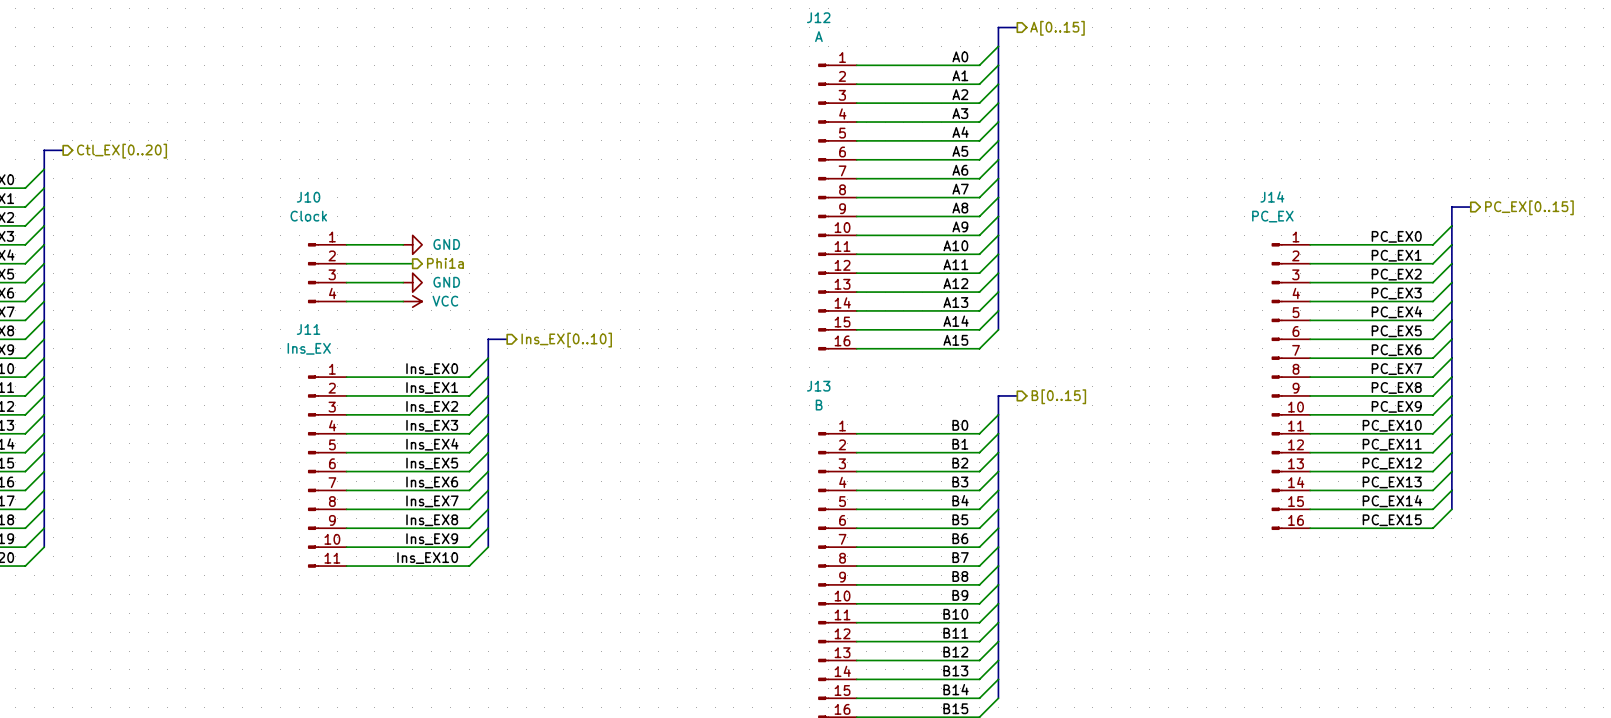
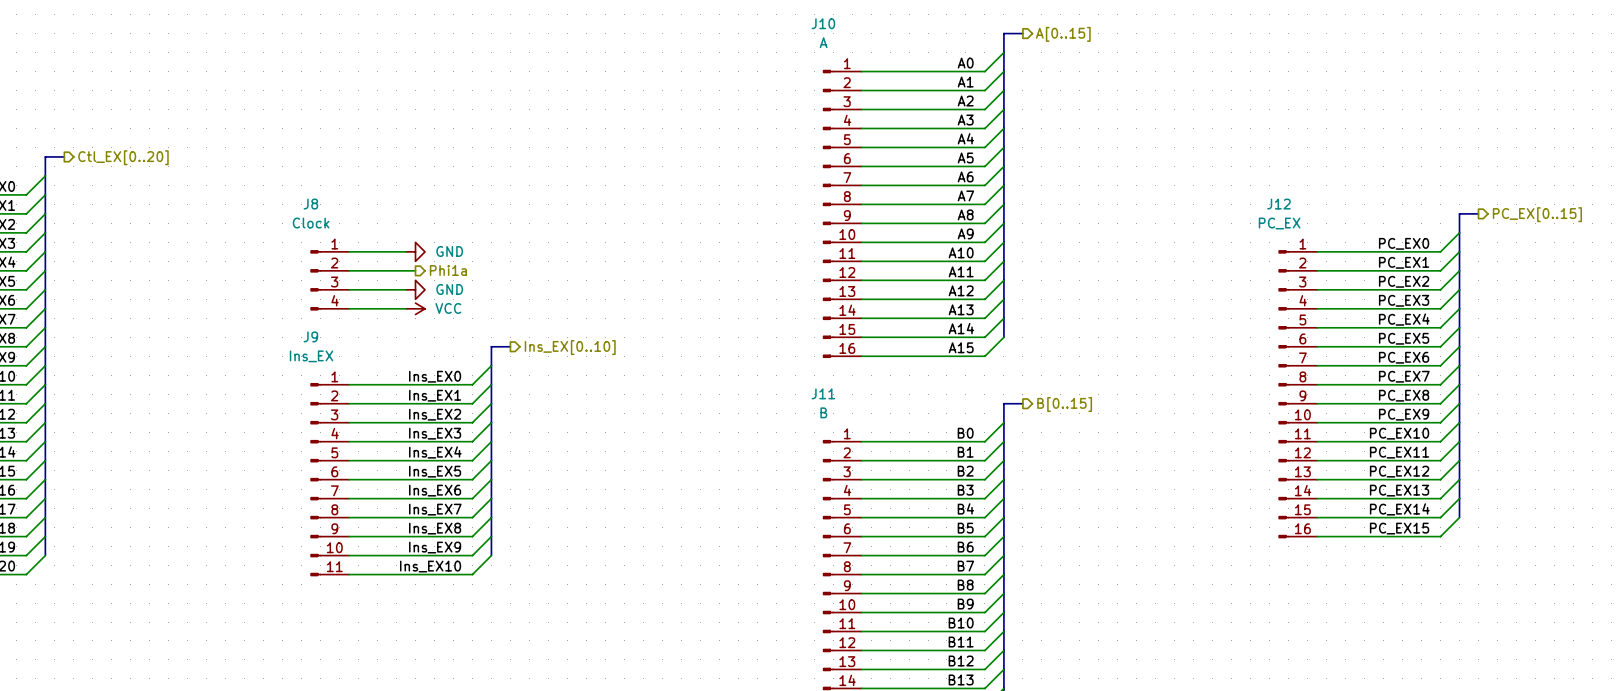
J12 name: J12 (818, 17) -> J10 (823, 23)
J10 name: J10 (308, 197) -> J8 (310, 204)
J14 name: J14 (1272, 197) -> J12 (1278, 204)
J11 name: J11 (308, 329) -> J9 (310, 336)
J13 name: J13 (818, 386) -> J11 (823, 393)

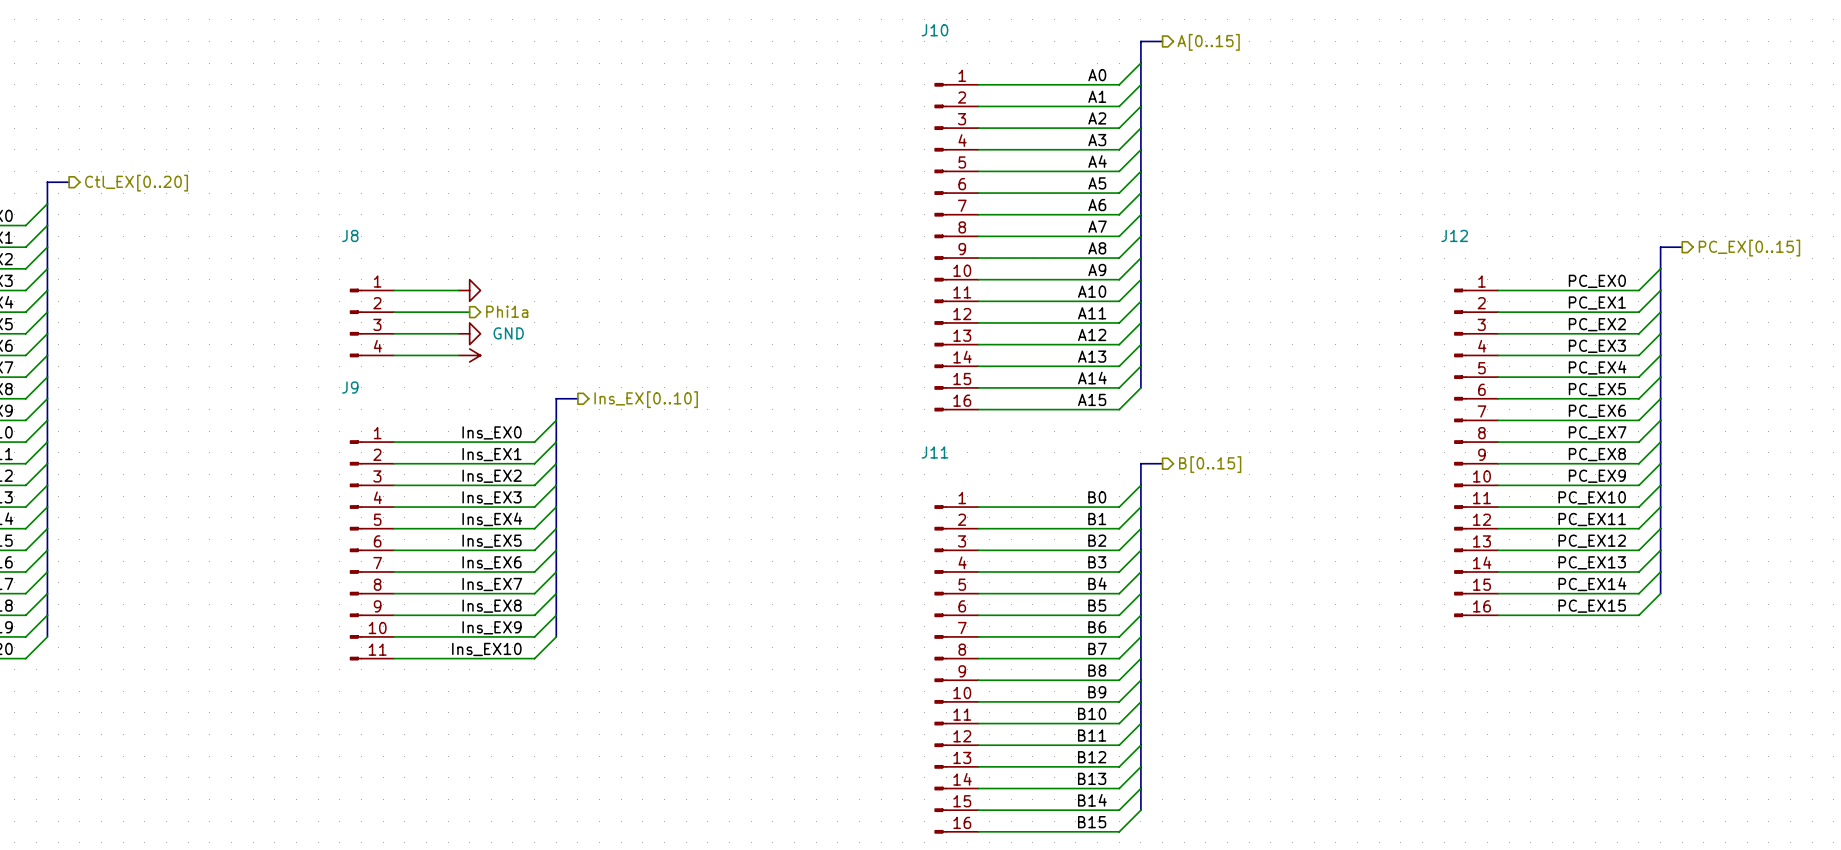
J10 value: A (823, 42) -> none
J8 value: Clock (311, 223) -> none
J12 value: PC_EX (1279, 223) -> none
power symbol text: GND (449, 251) -> none
power symbol text: VCC (448, 308) -> none
J9 value: Ins_EX (311, 356) -> none
J11 value: B (823, 412) -> none

